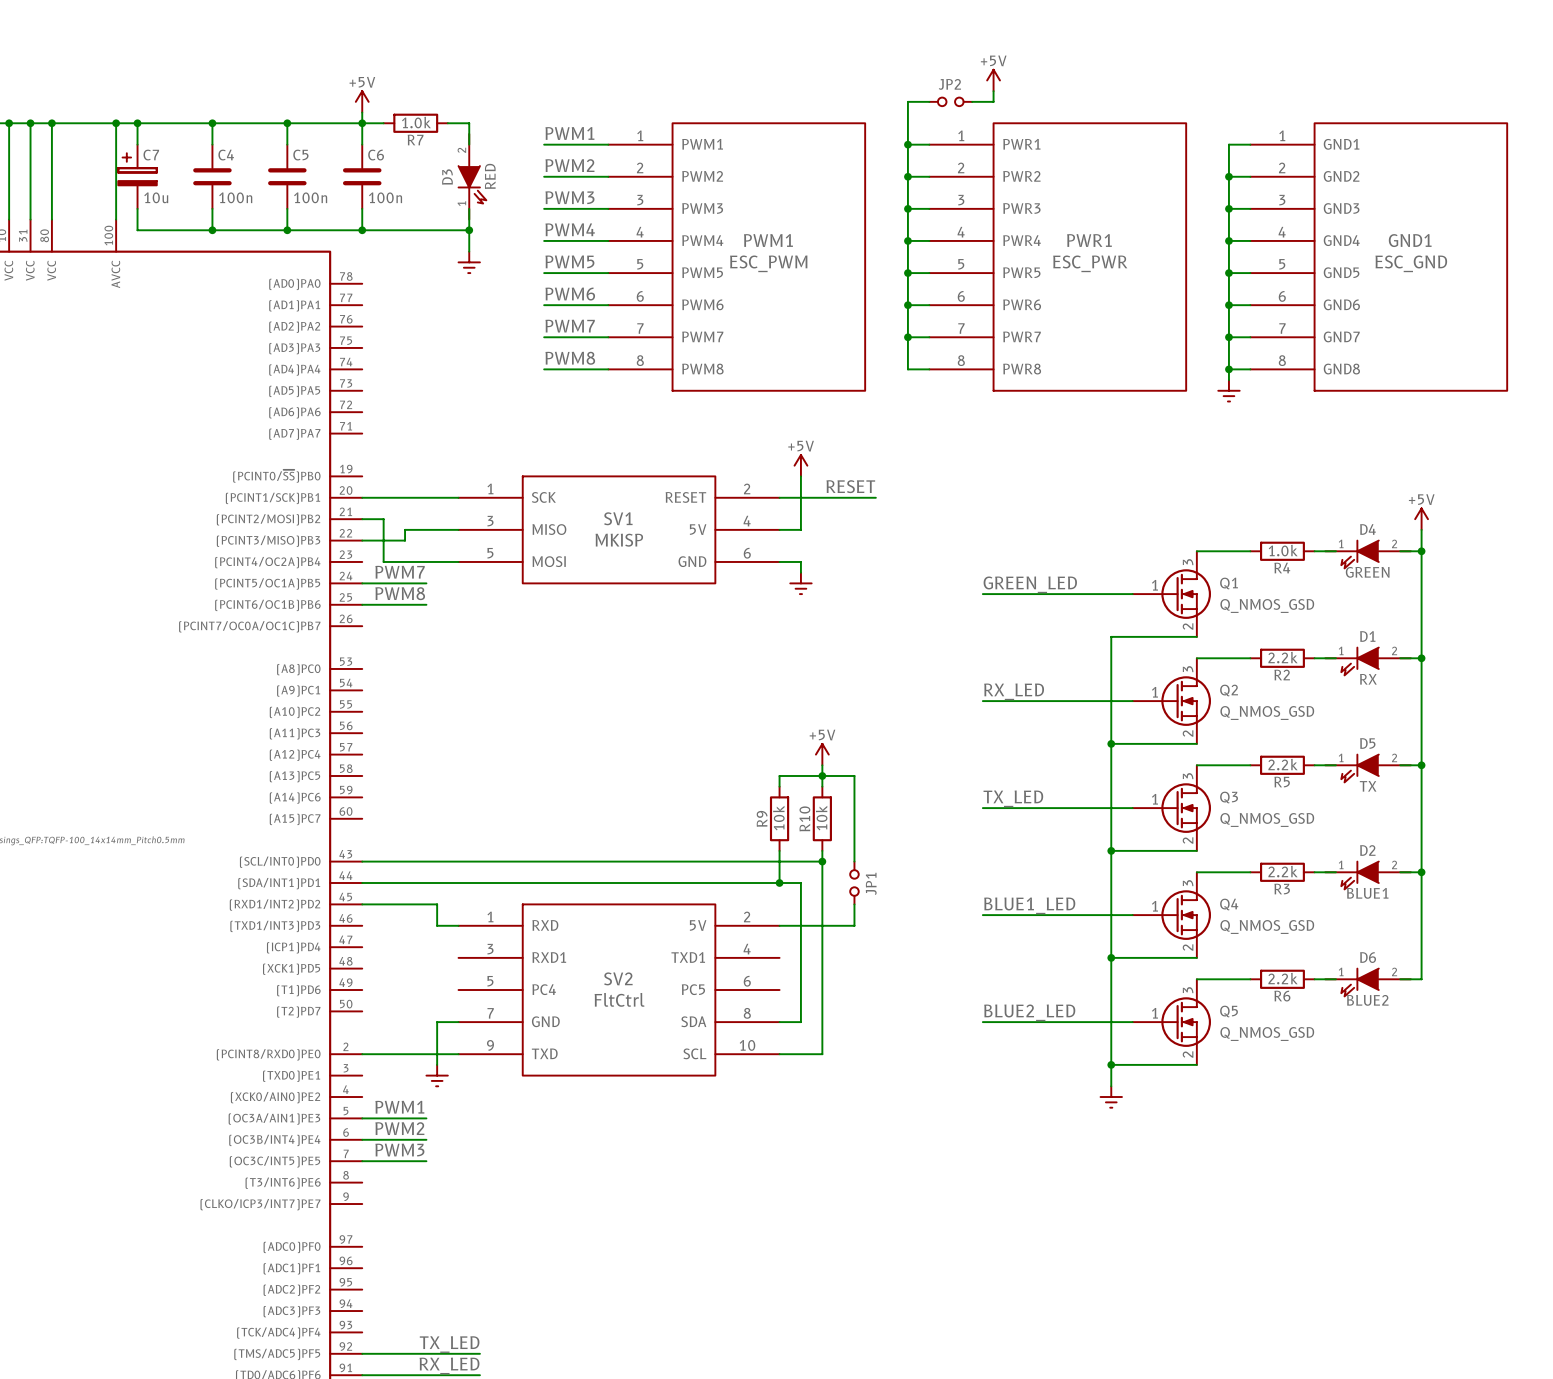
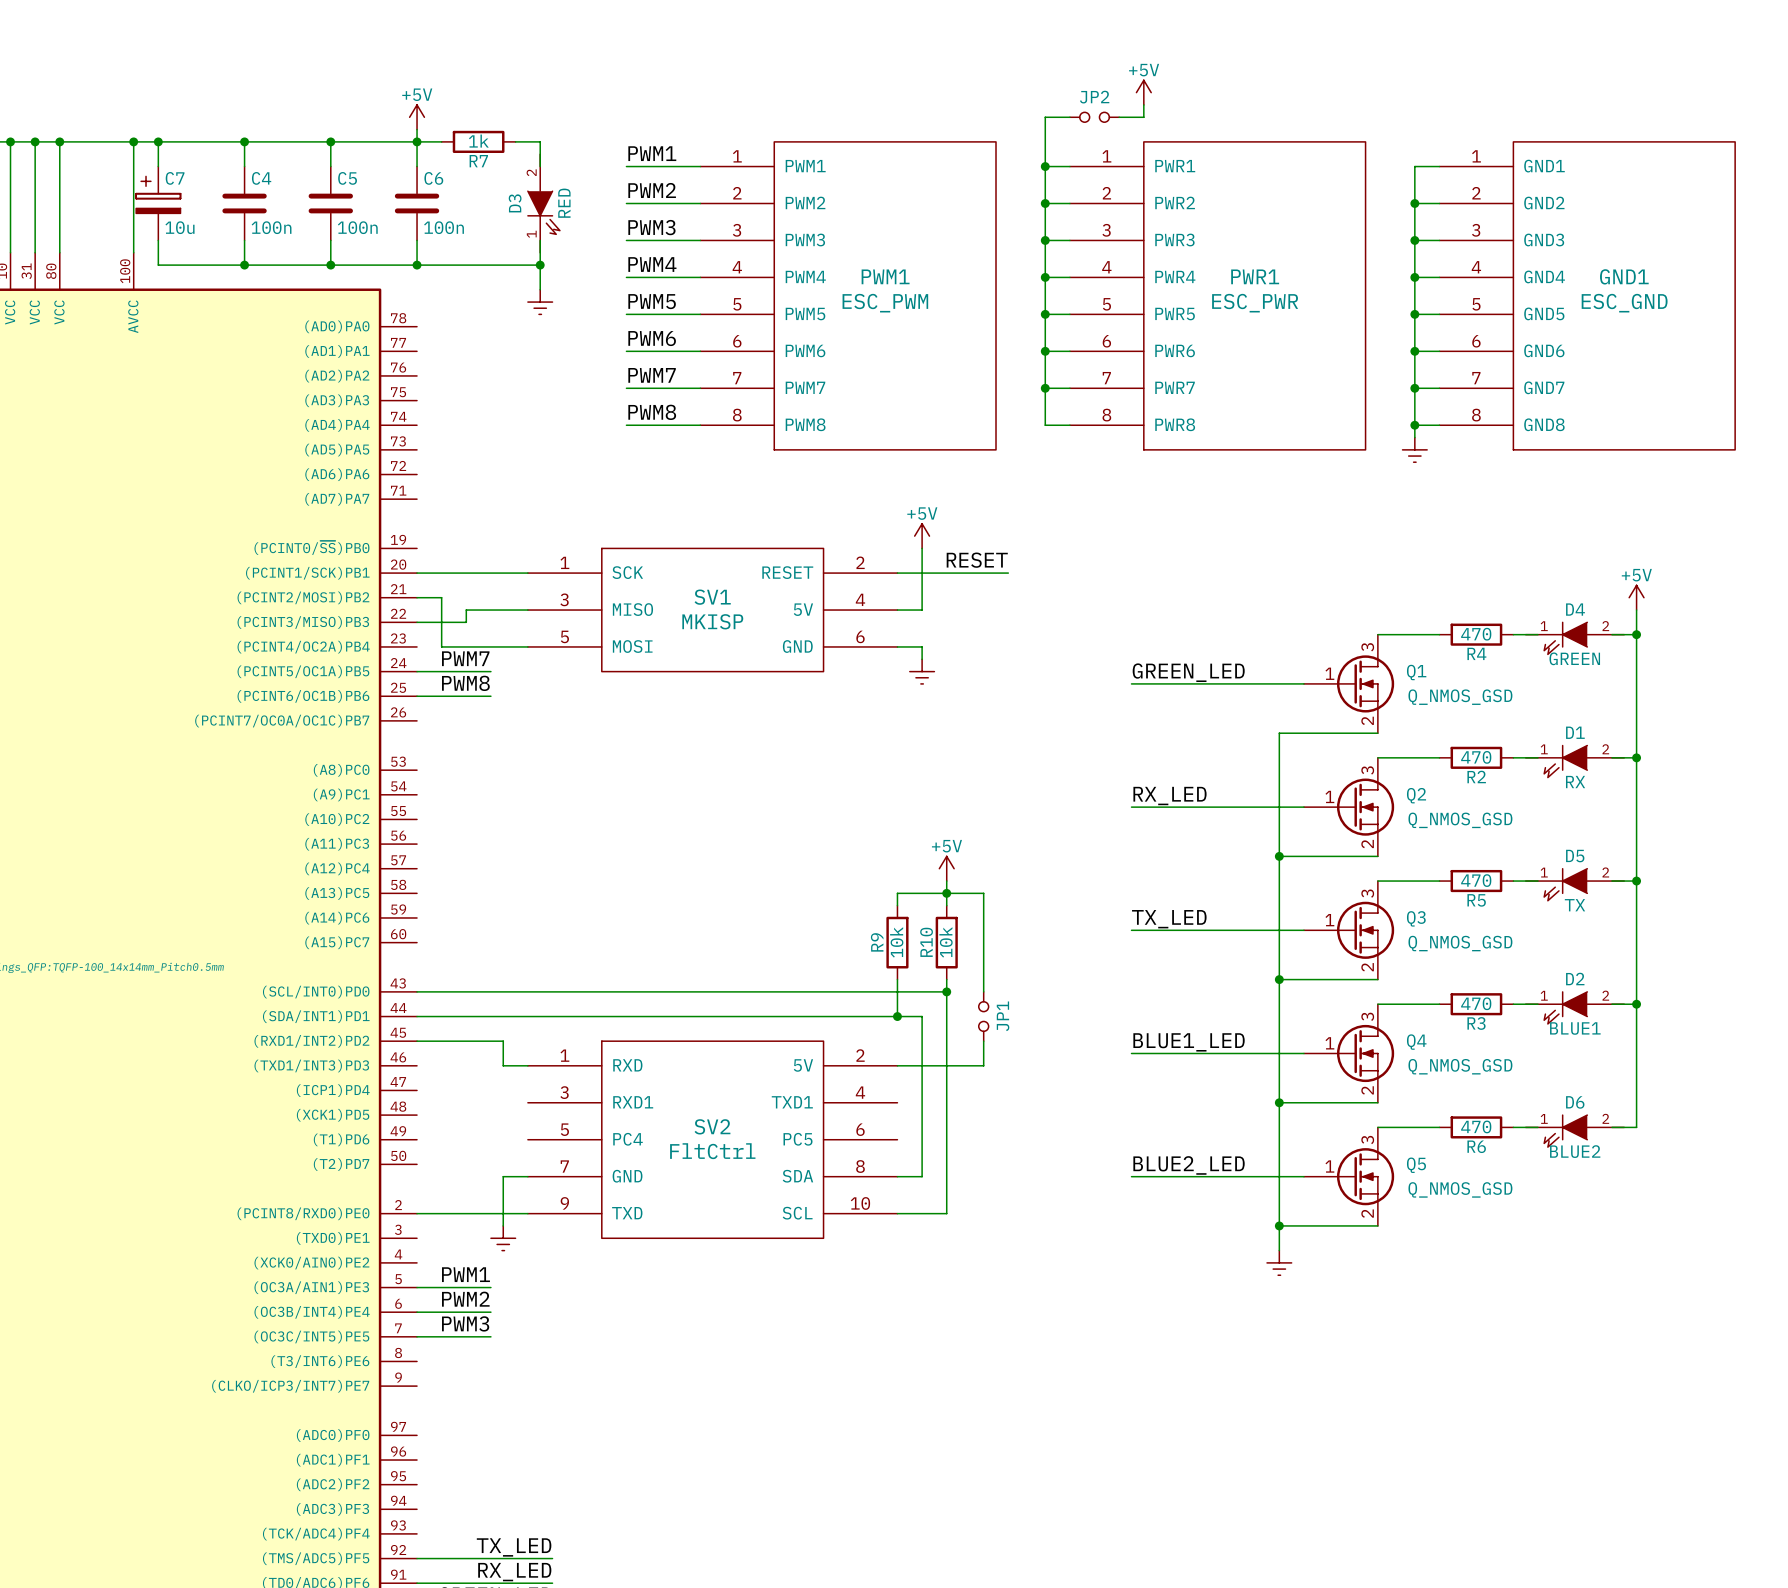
R7 value: 1.0k (416, 122) -> 1k (478, 141)
R4 value: 1.0k (1283, 550) -> 470 (1476, 634)
R2 value: 2.2k (1283, 657) -> 470 (1476, 757)
R5 value: 2.2k (1283, 764) -> 470 (1476, 880)
R3 value: 2.2k (1283, 871) -> 470 (1476, 1003)
R6 value: 2.2k (1283, 978) -> 470 (1476, 1126)

